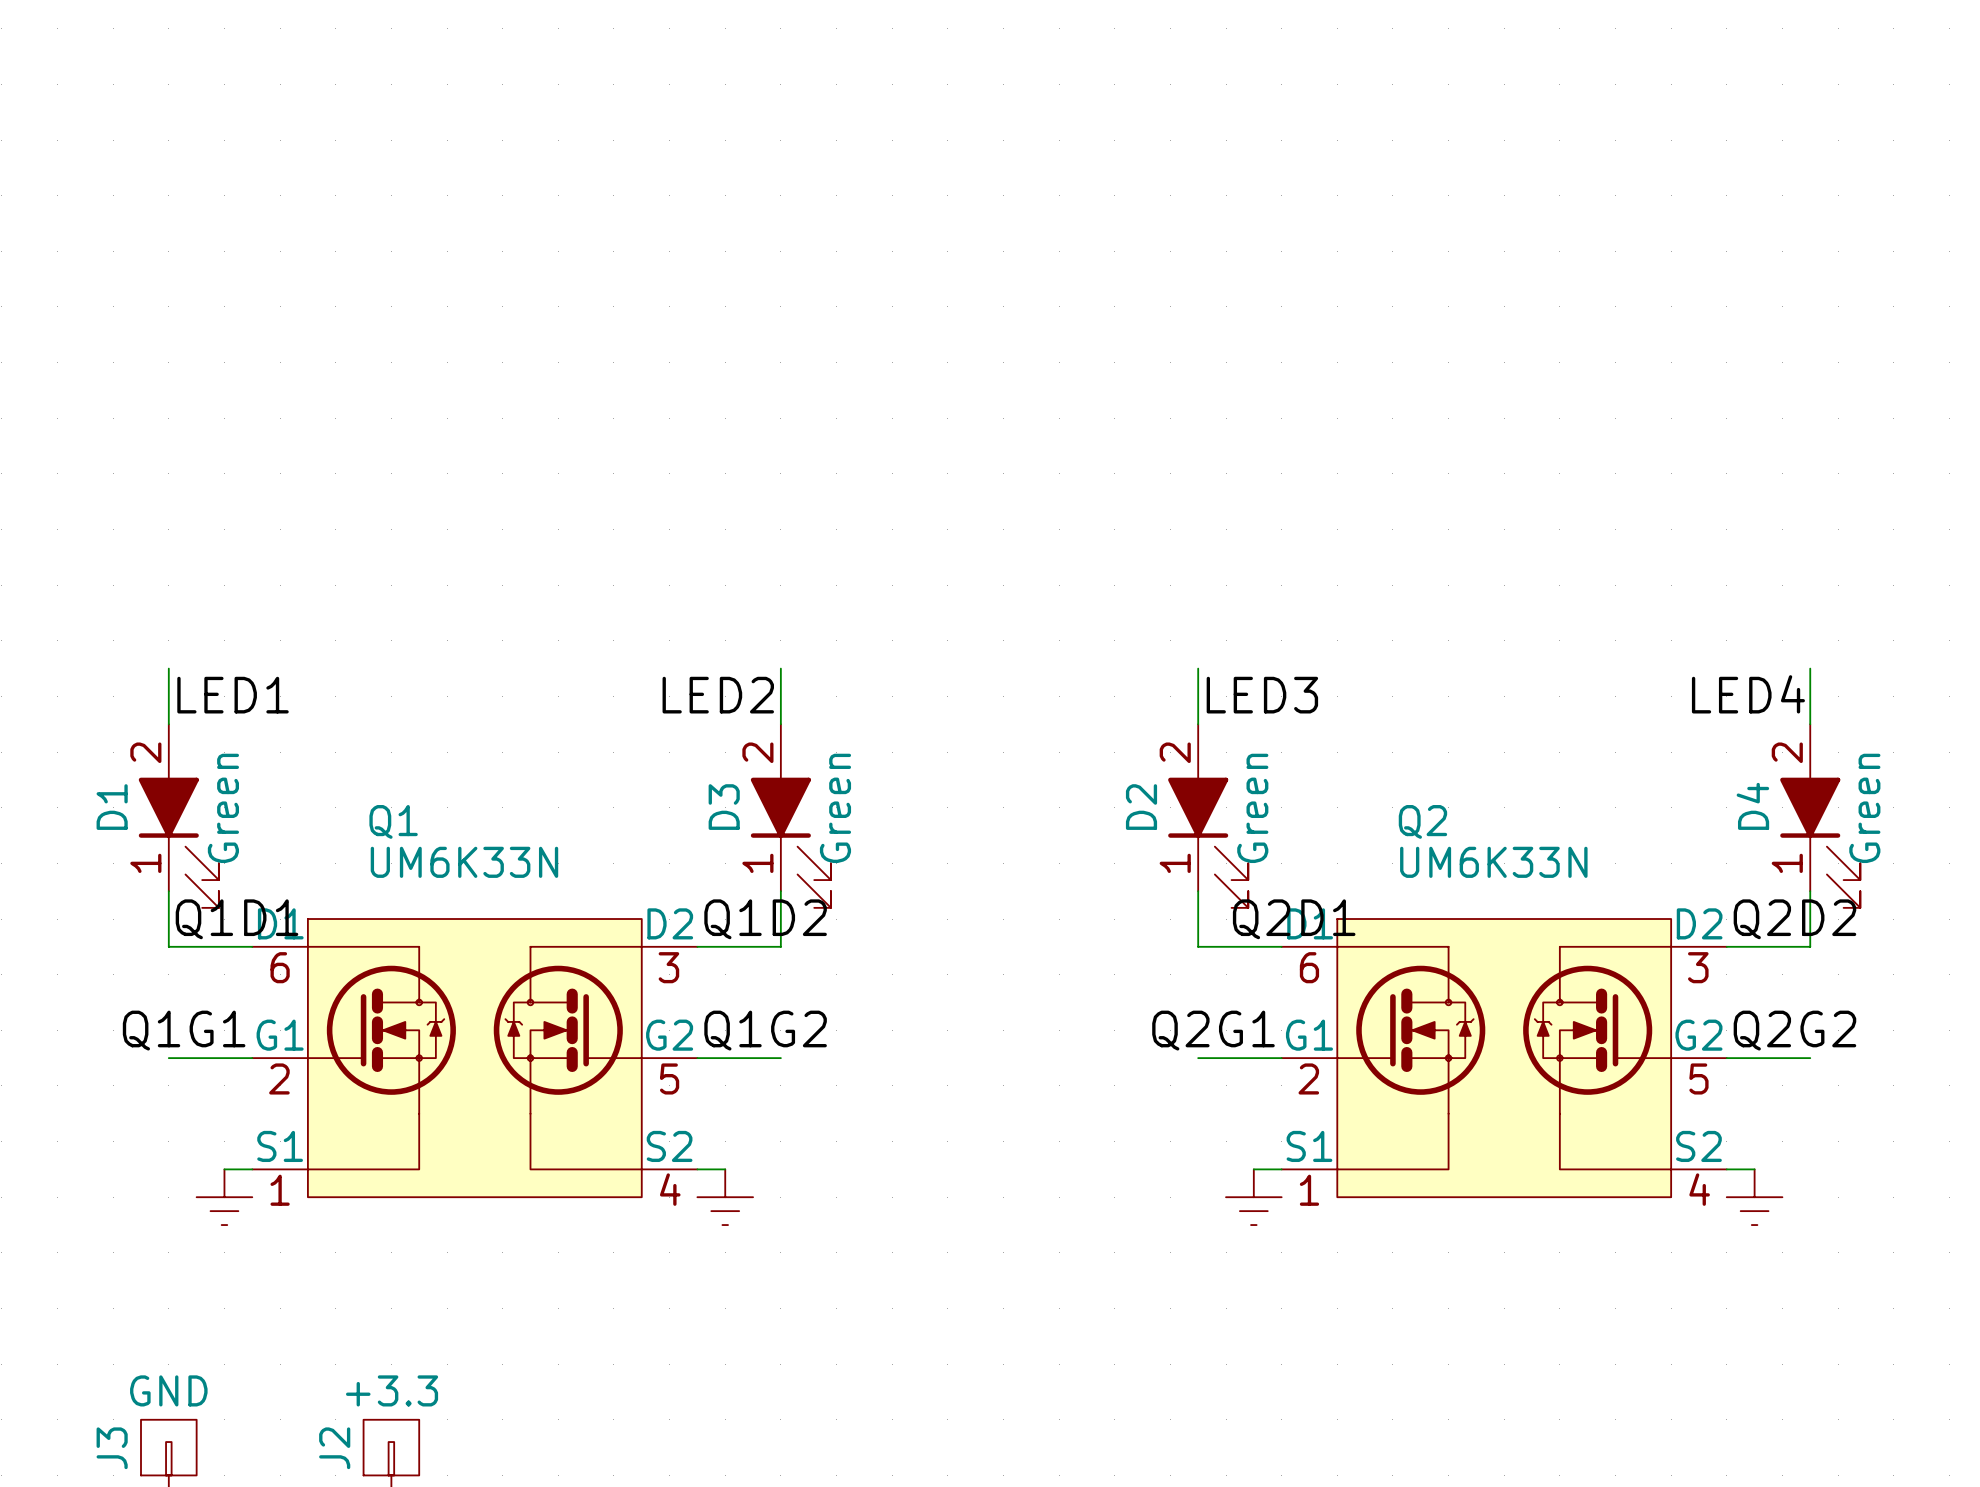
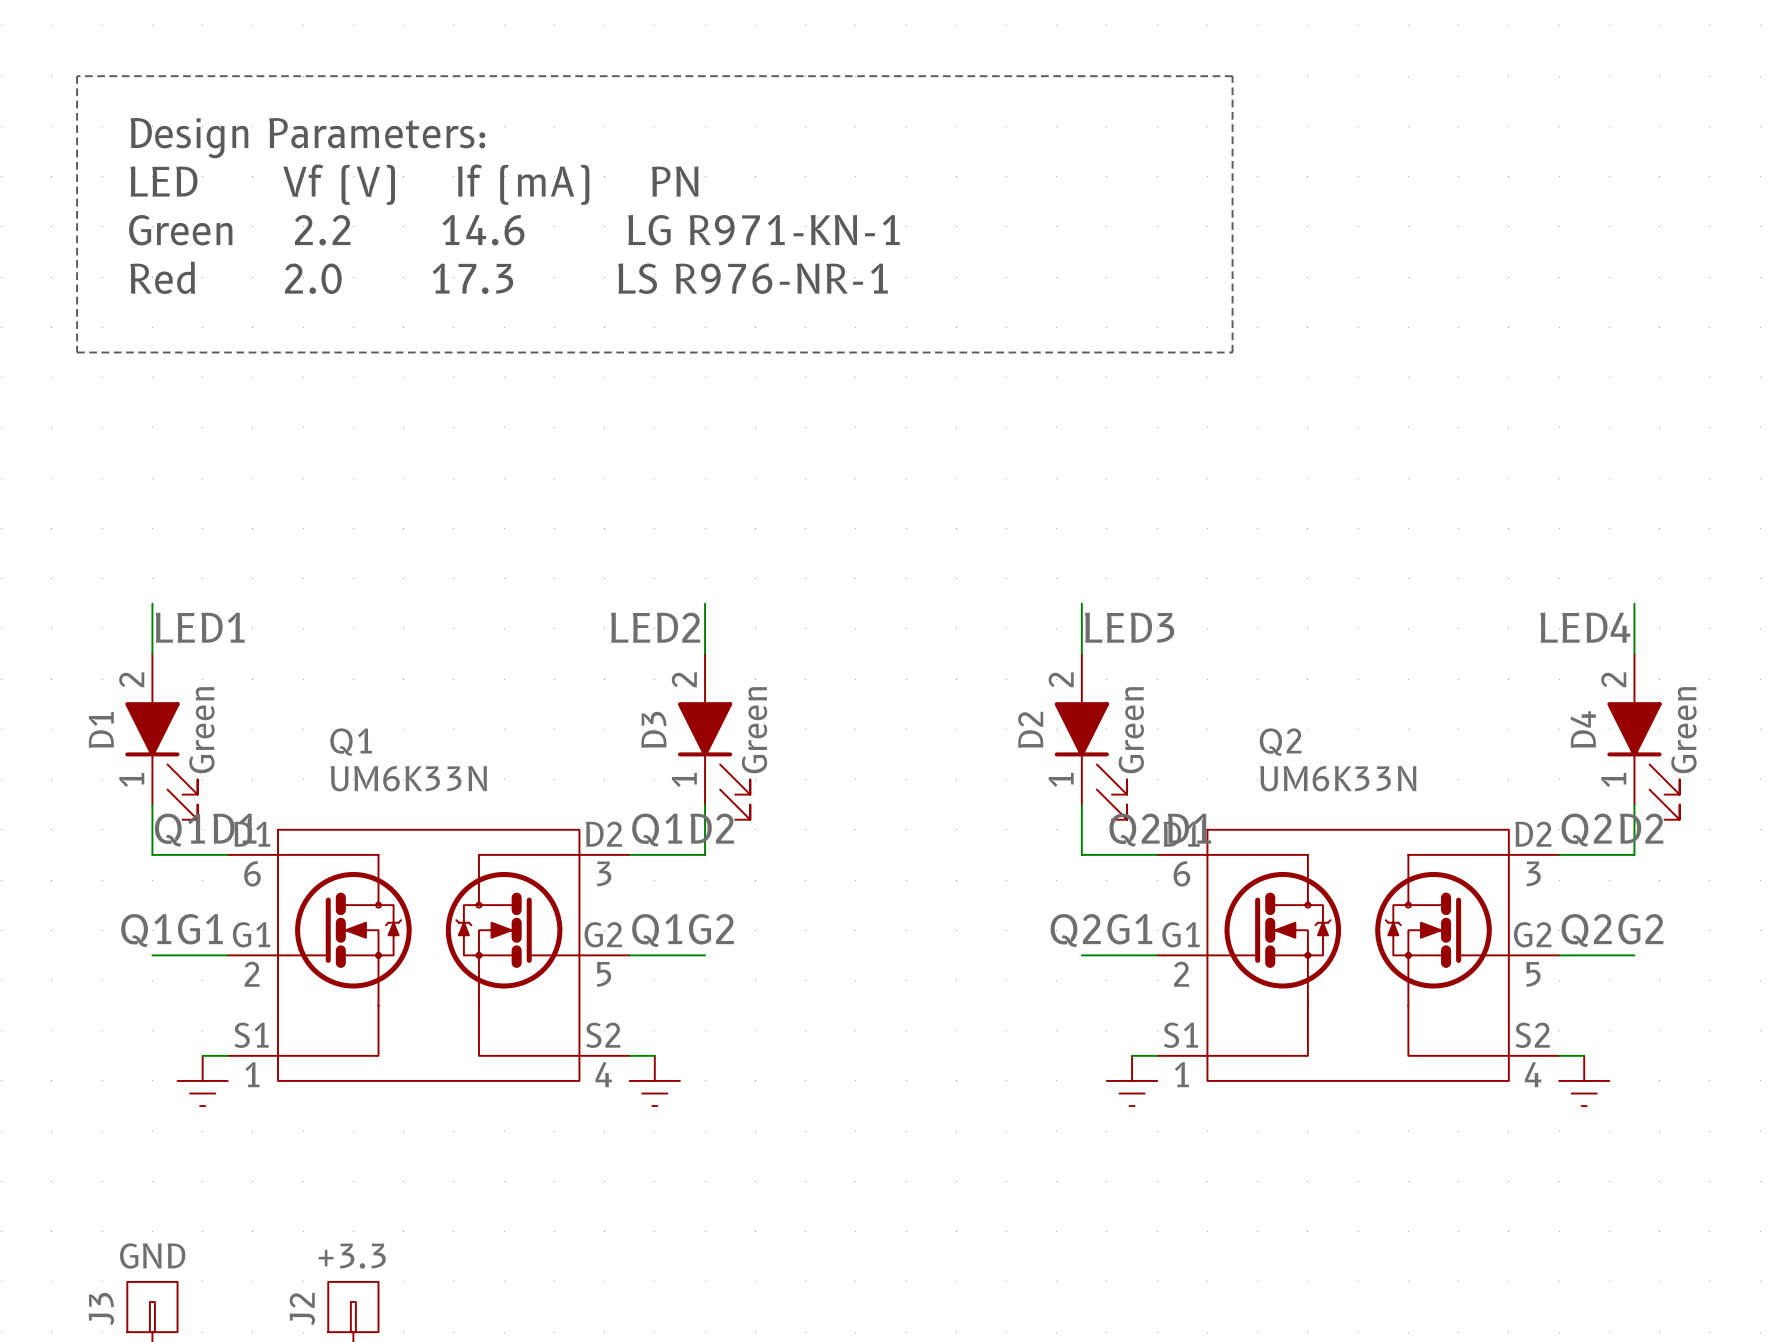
line: none -> (77, 76) (77, 352) (1232, 352) (1232, 76) (77, 76)
text: none -> Design Parameters: (307, 138)
text: none -> LED Vf (V) If (mA) PN (414, 184)
text: none -> Green 2.2 14.6 LG R971-KN-1 (514, 230)
text: none -> Red 2.0 17.3 LS R976-NR-1 (509, 277)

